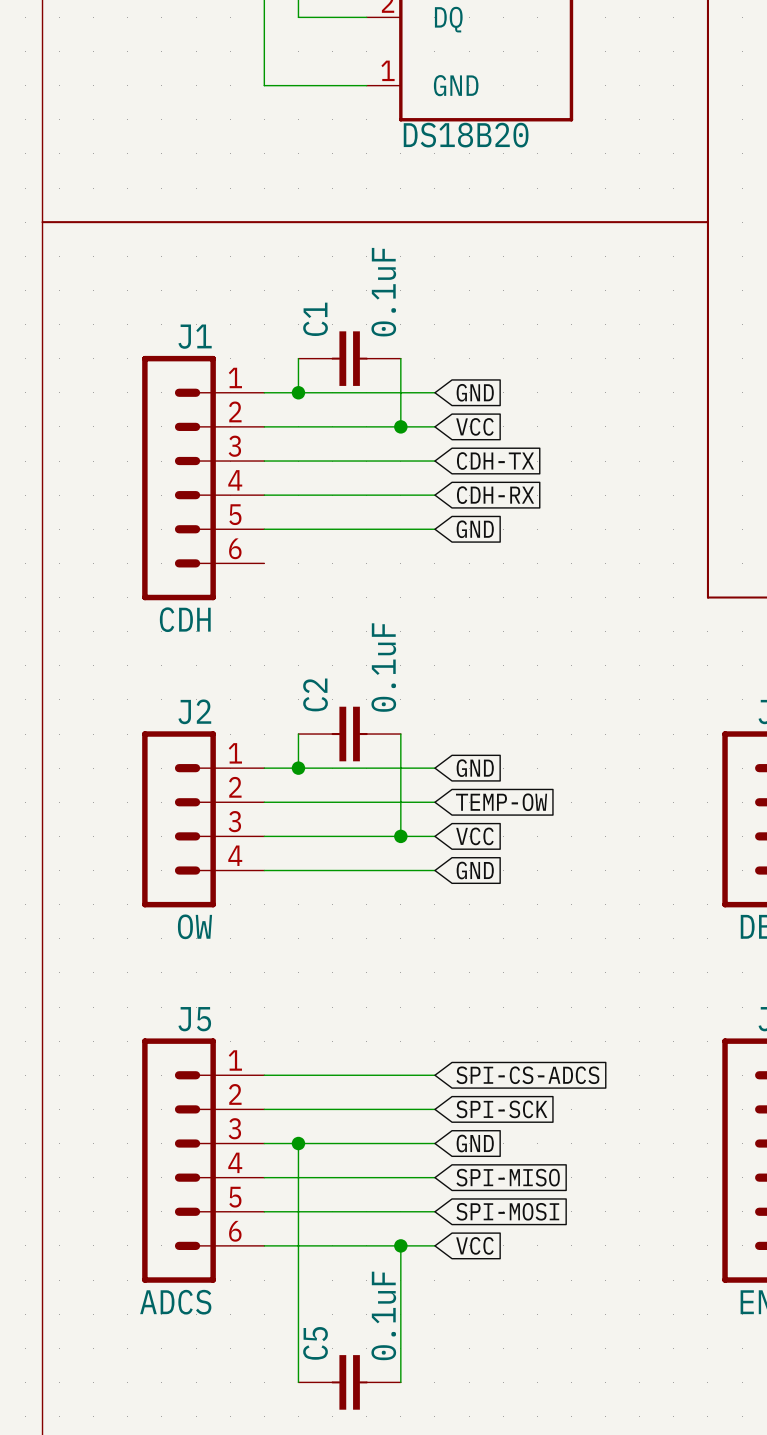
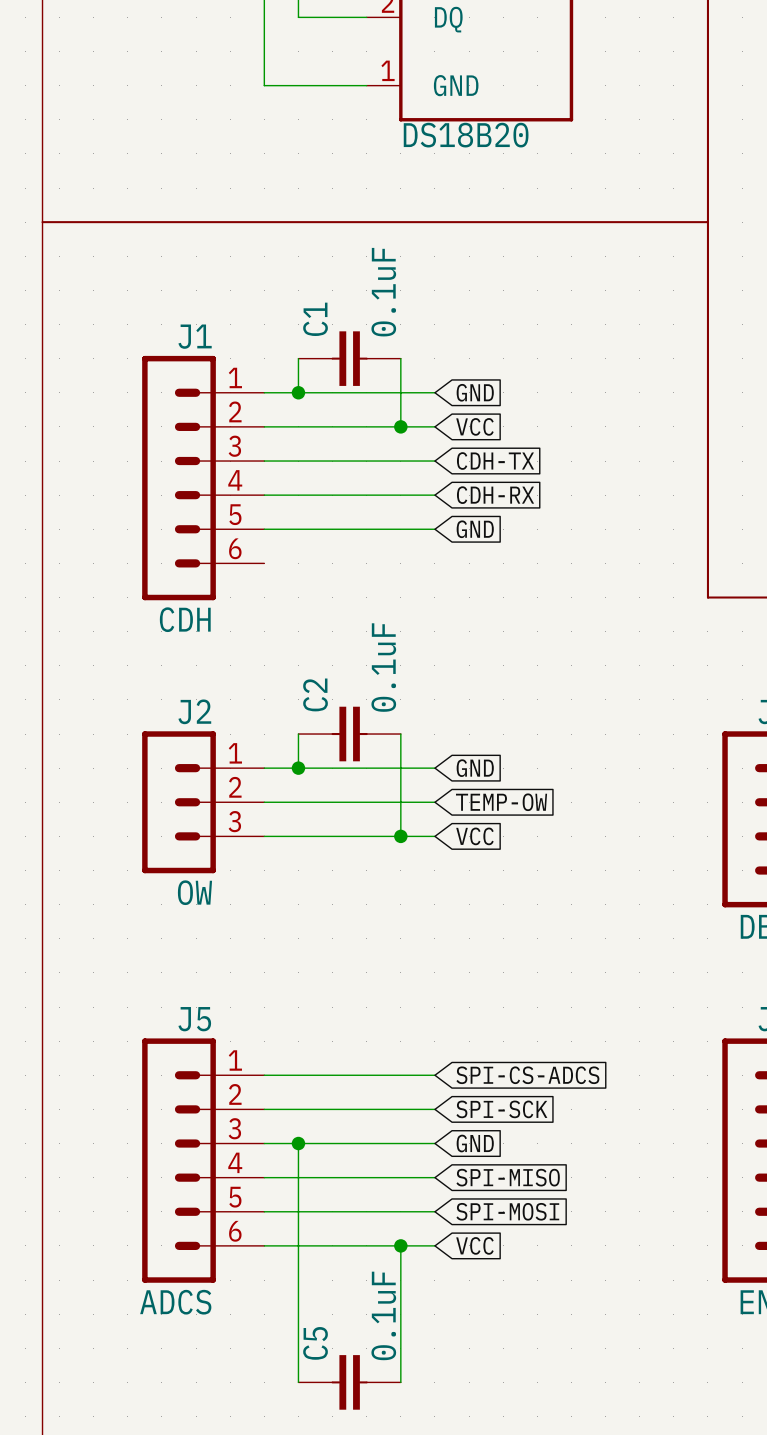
J2 symbol: [142, 731, 265, 908] -> [142, 731, 265, 874]
wire: (264, 870) (434, 870) -> none
global label: GND (475, 870) -> none

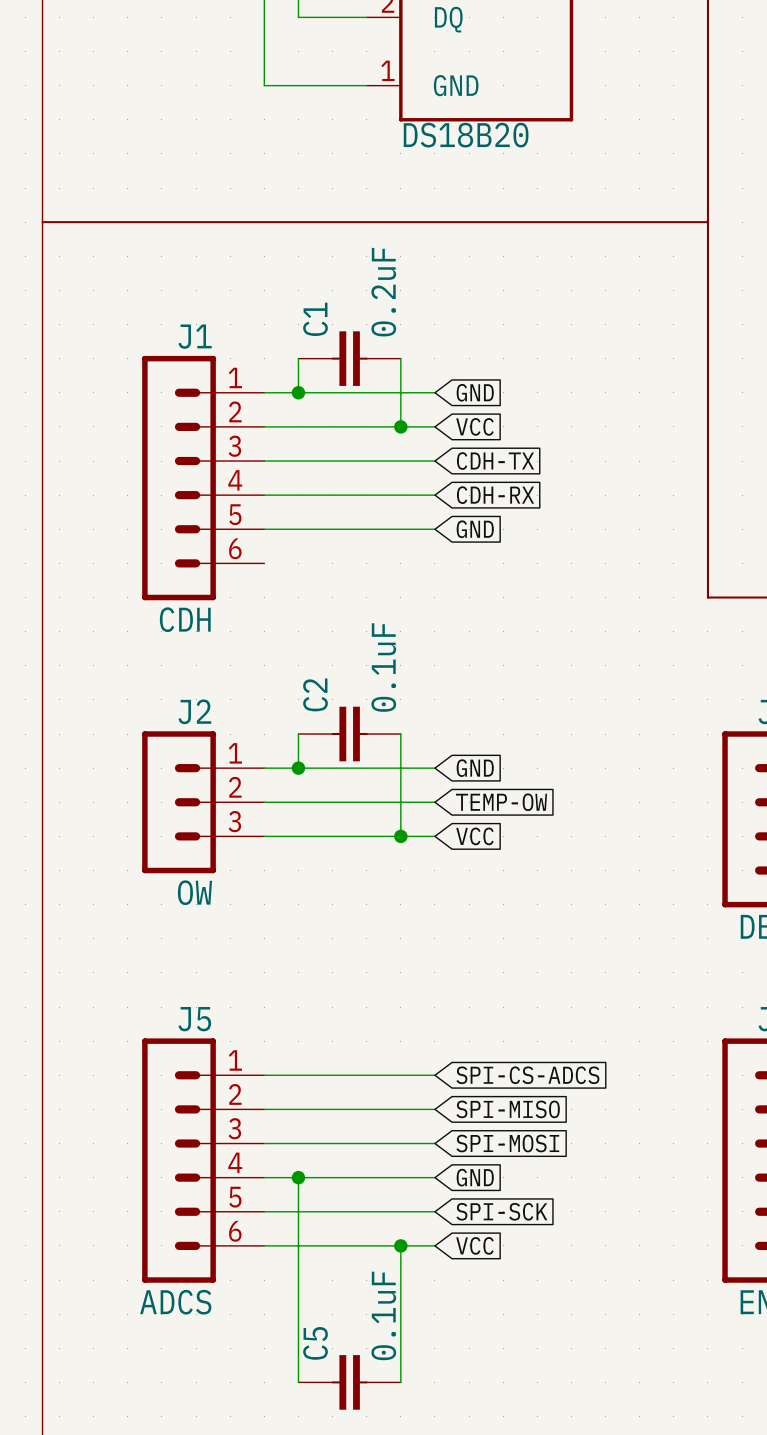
C1 value: 0.1uF (383, 292) -> 0.2uF (383, 292)
global label: SPI-SCK (501, 1109) -> SPI-MISO (508, 1109)
wire: (298, 1143) (298, 1177) -> none
junction position: (298, 1143) -> (298, 1177)
global label: GND (475, 1143) -> SPI-MOSI (507, 1143)
global label: SPI-MISO (508, 1177) -> GND (475, 1177)
global label: SPI-MOSI (507, 1211) -> SPI-SCK (501, 1211)

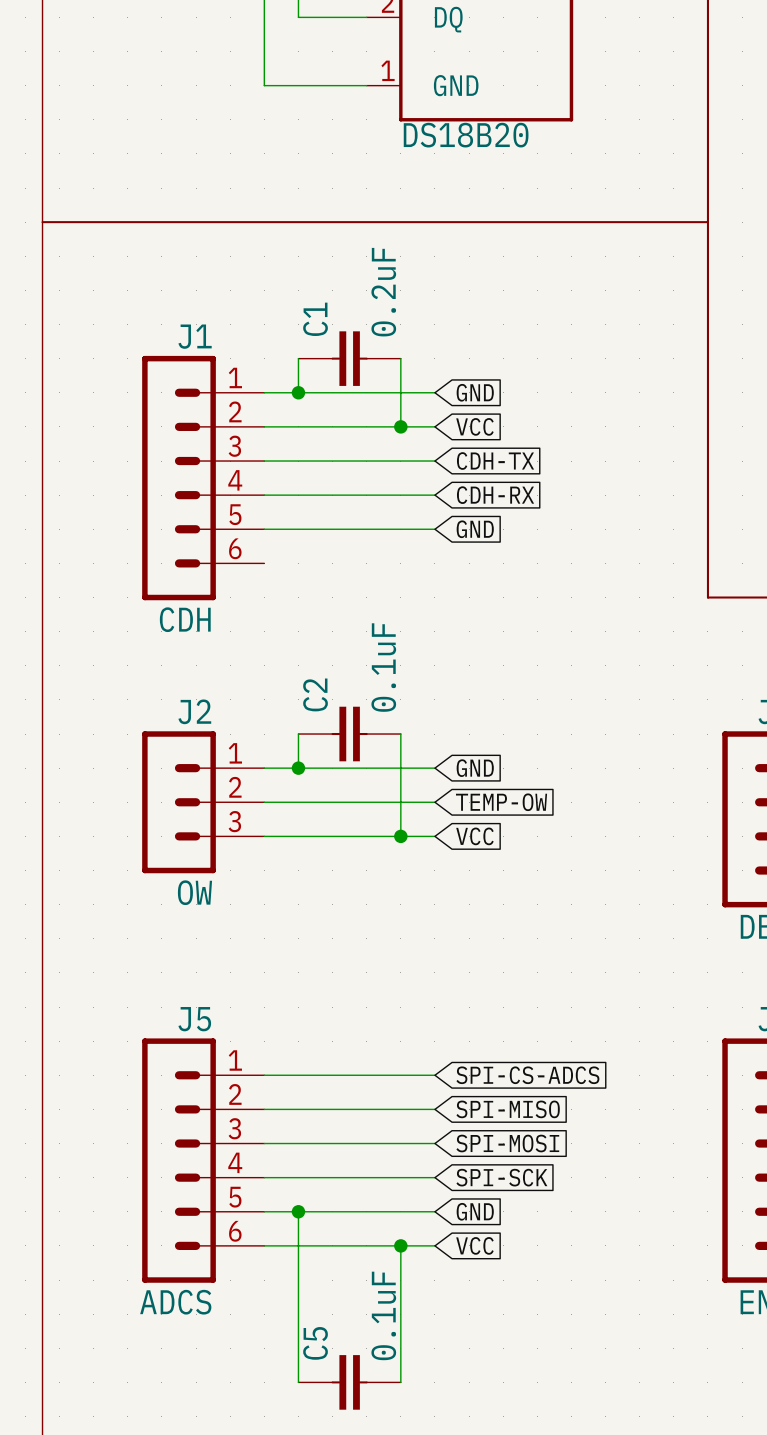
wire: (298, 1177) (298, 1211) -> none
junction position: (298, 1177) -> (298, 1211)
global label: GND (475, 1177) -> SPI-SCK (501, 1177)
global label: SPI-SCK (501, 1211) -> GND (475, 1211)

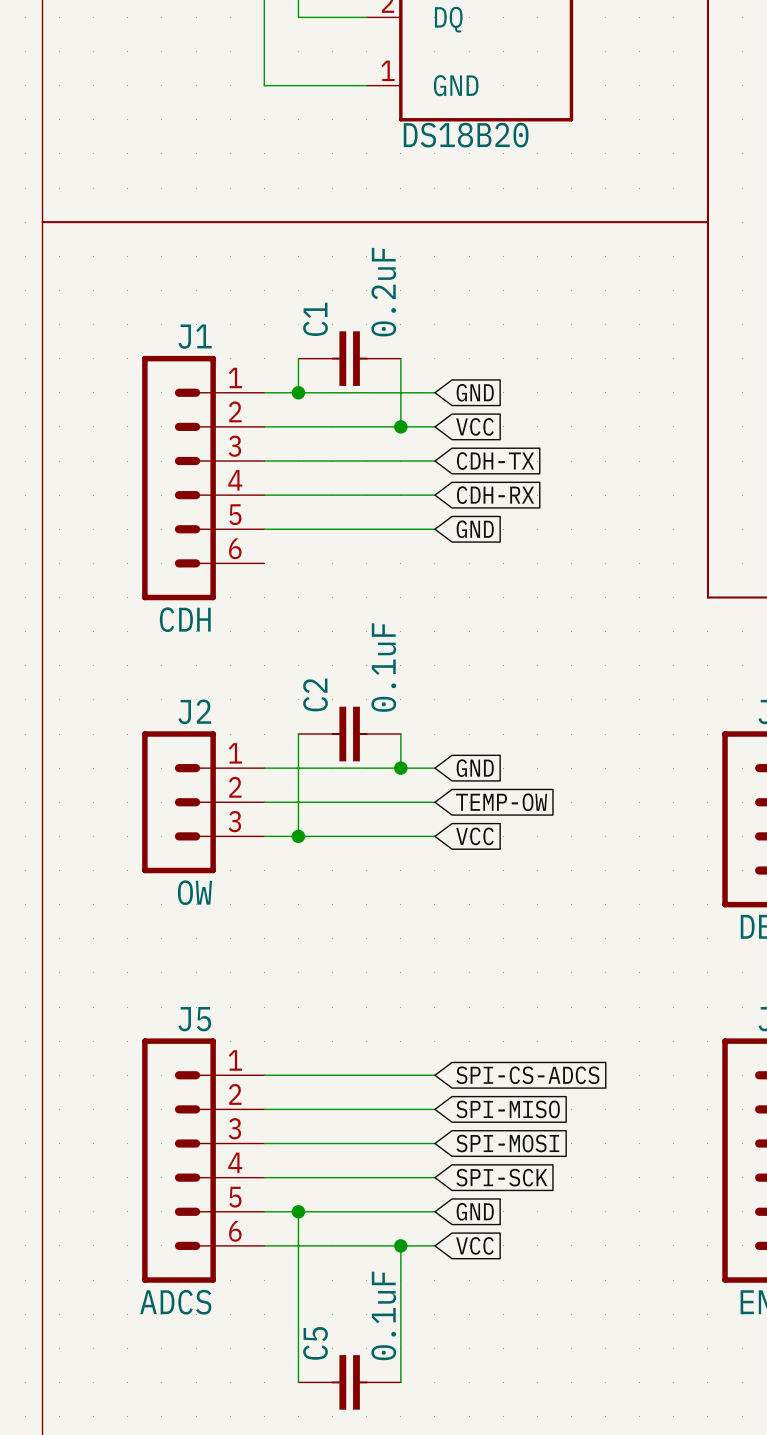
junction: (298, 768) -> none
wire: (400, 768) (400, 836) -> (298, 768) (298, 836)
junction: none -> (400, 768)
junction: none -> (298, 836)
junction: (400, 836) -> none

